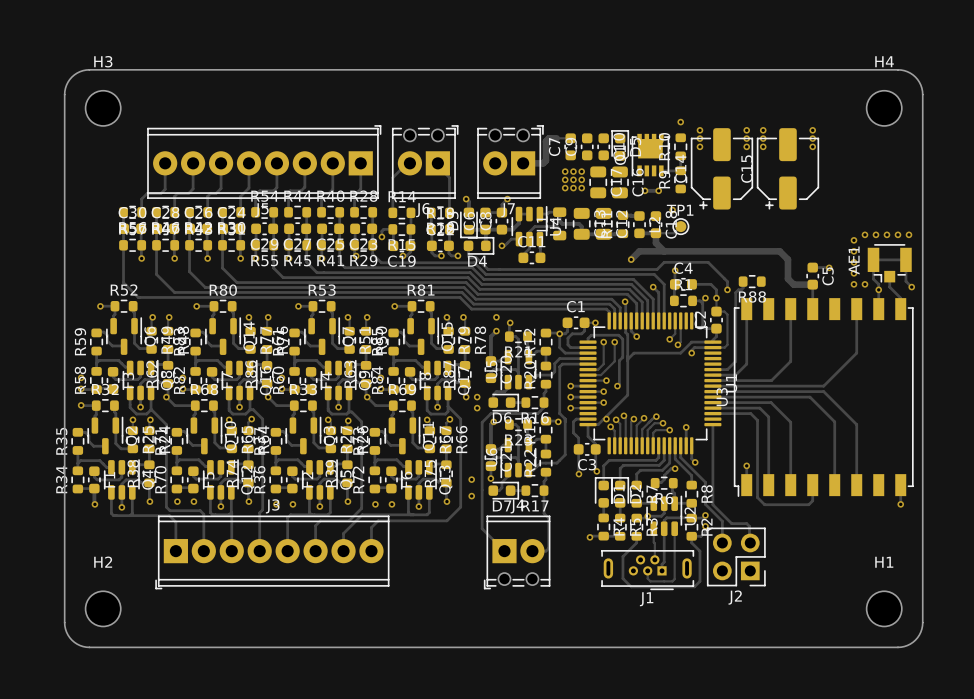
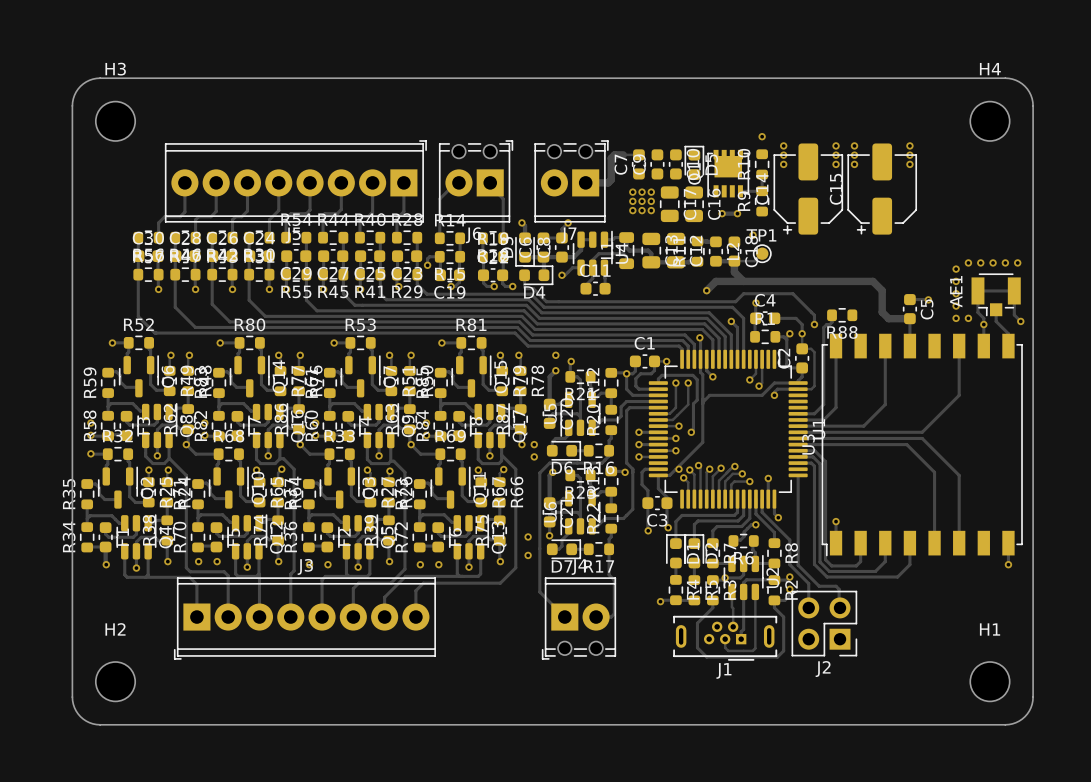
track: (727, 402) (771, 402) (790, 422) (790, 485) -> (813, 456) (820, 463) (820, 562) (829, 571) (875, 571) (885, 561) (885, 543)
track: (726, 408) (759, 408) (768, 417) (768, 485) -> (814, 450) (825, 461) (825, 559) (831, 565) (856, 565) (860, 561) (860, 543)
track: (724, 413) (750, 413) (757, 420) (757, 497) (764, 504) (808, 504) (812, 500) -> (811, 463) (814, 466) (814, 564) (827, 577) (897, 577) (909, 564) (909, 560)

